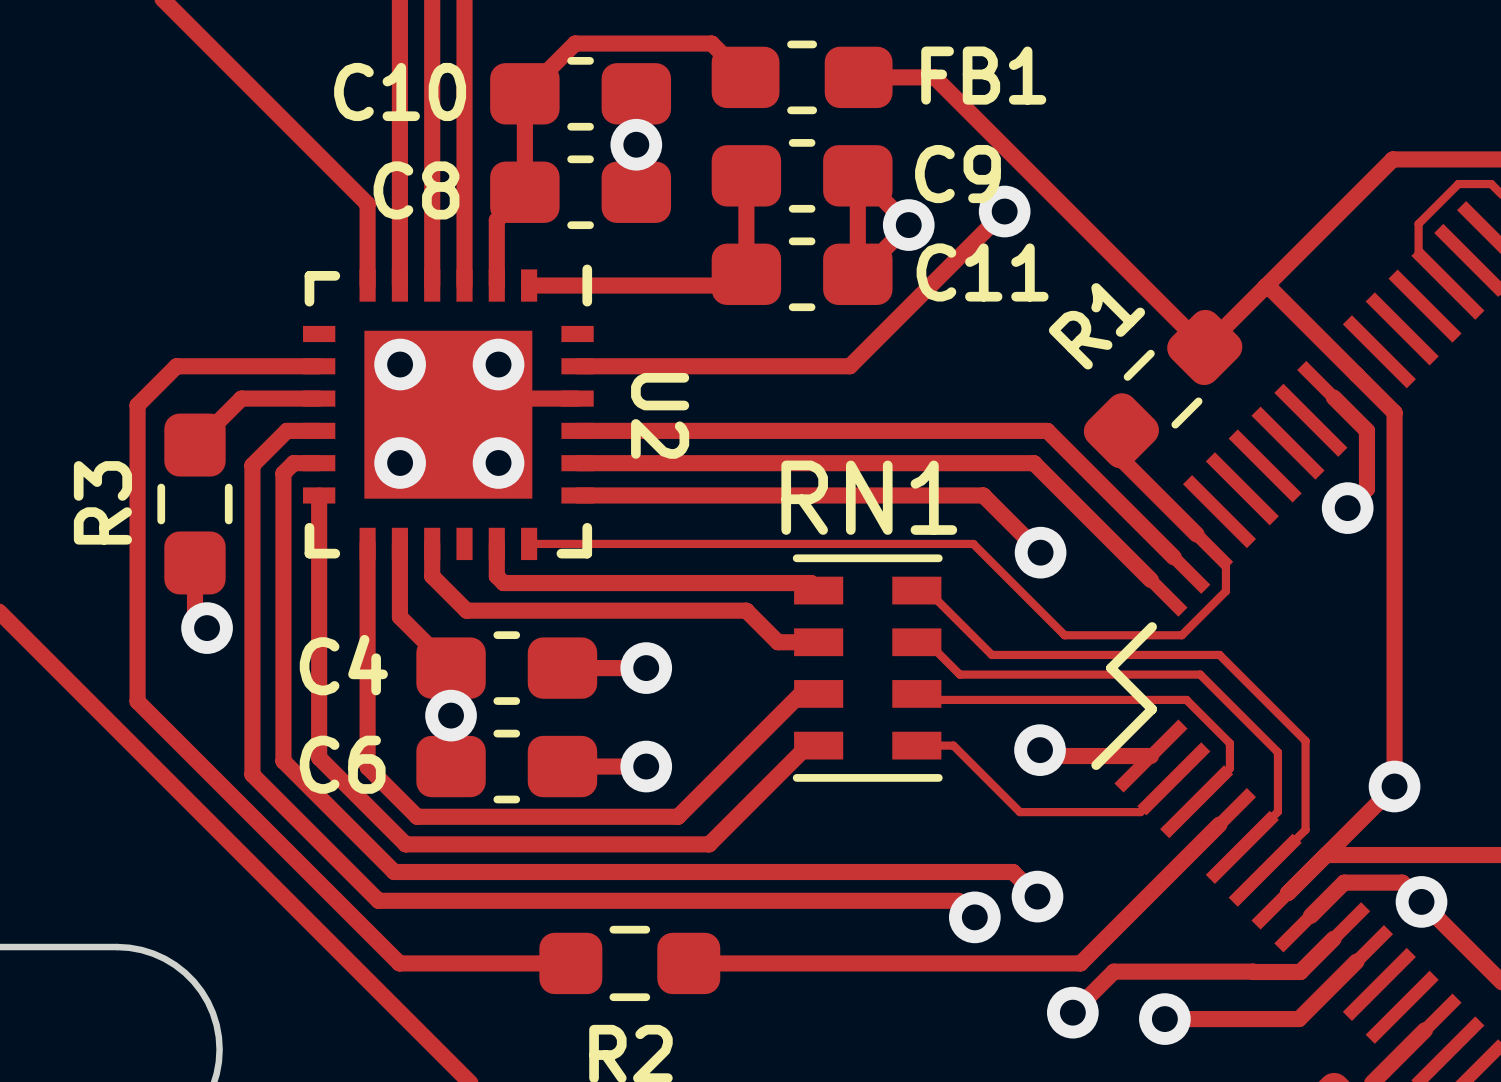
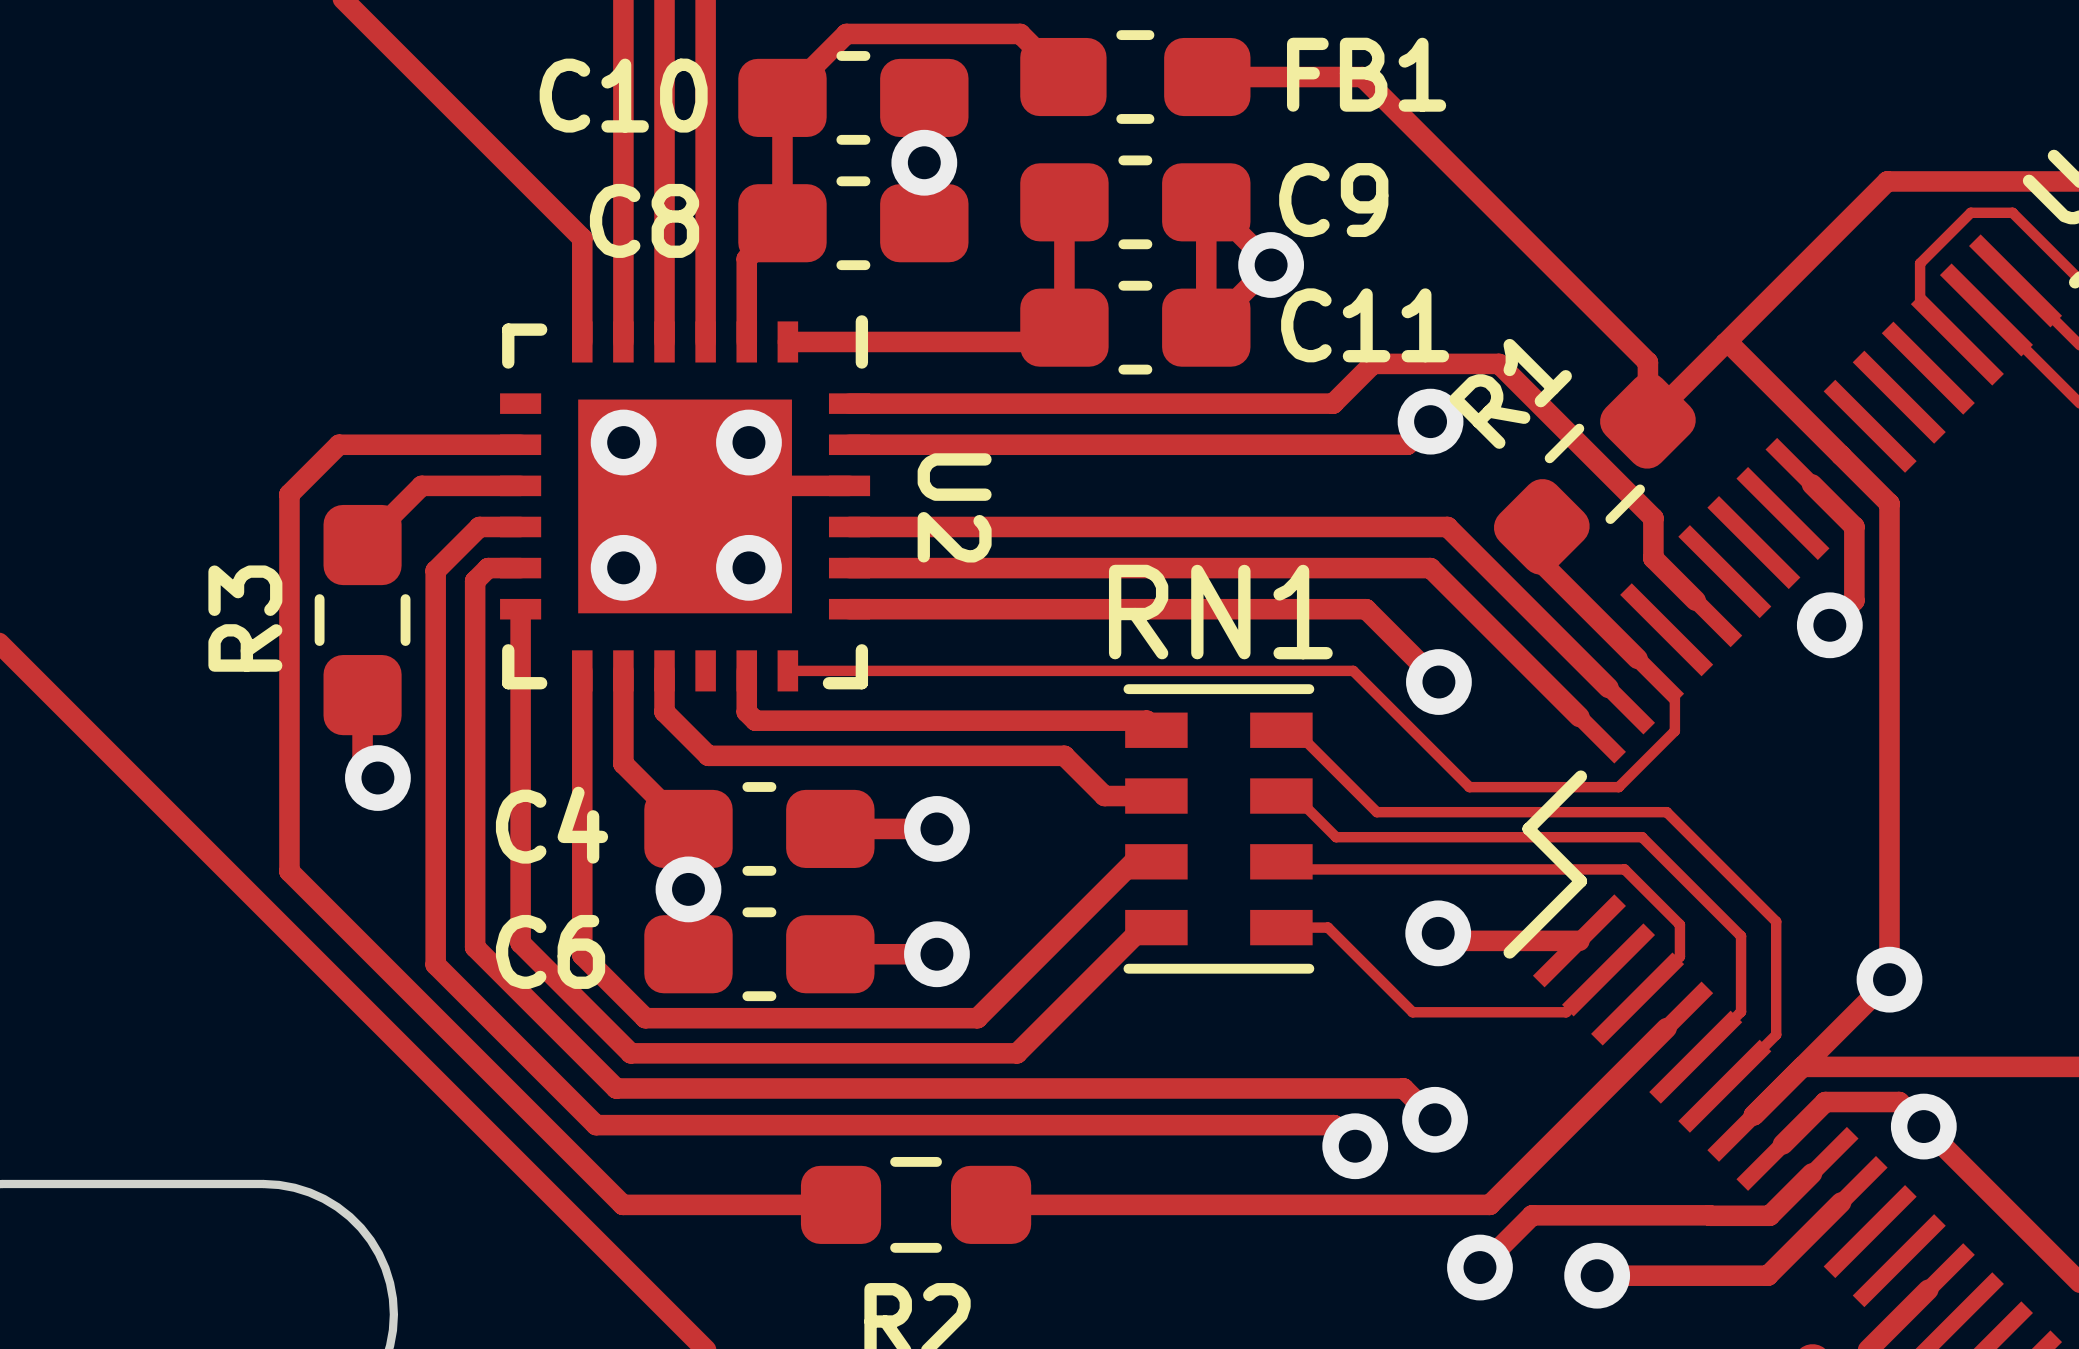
track: (934, 77) (1204, 347) -> (1304, 77) (1362, 77) (1647, 362) (1647, 420)
track: (1004, 211) (849, 366) -> (1430, 421) (1407, 444) (1196, 444)
via position: (1004, 211) -> (1430, 421)
track: none -> (849, 403) (1333, 403) (1372, 363) (1499, 363) (1653, 518) (1653, 558) (1695, 600)

